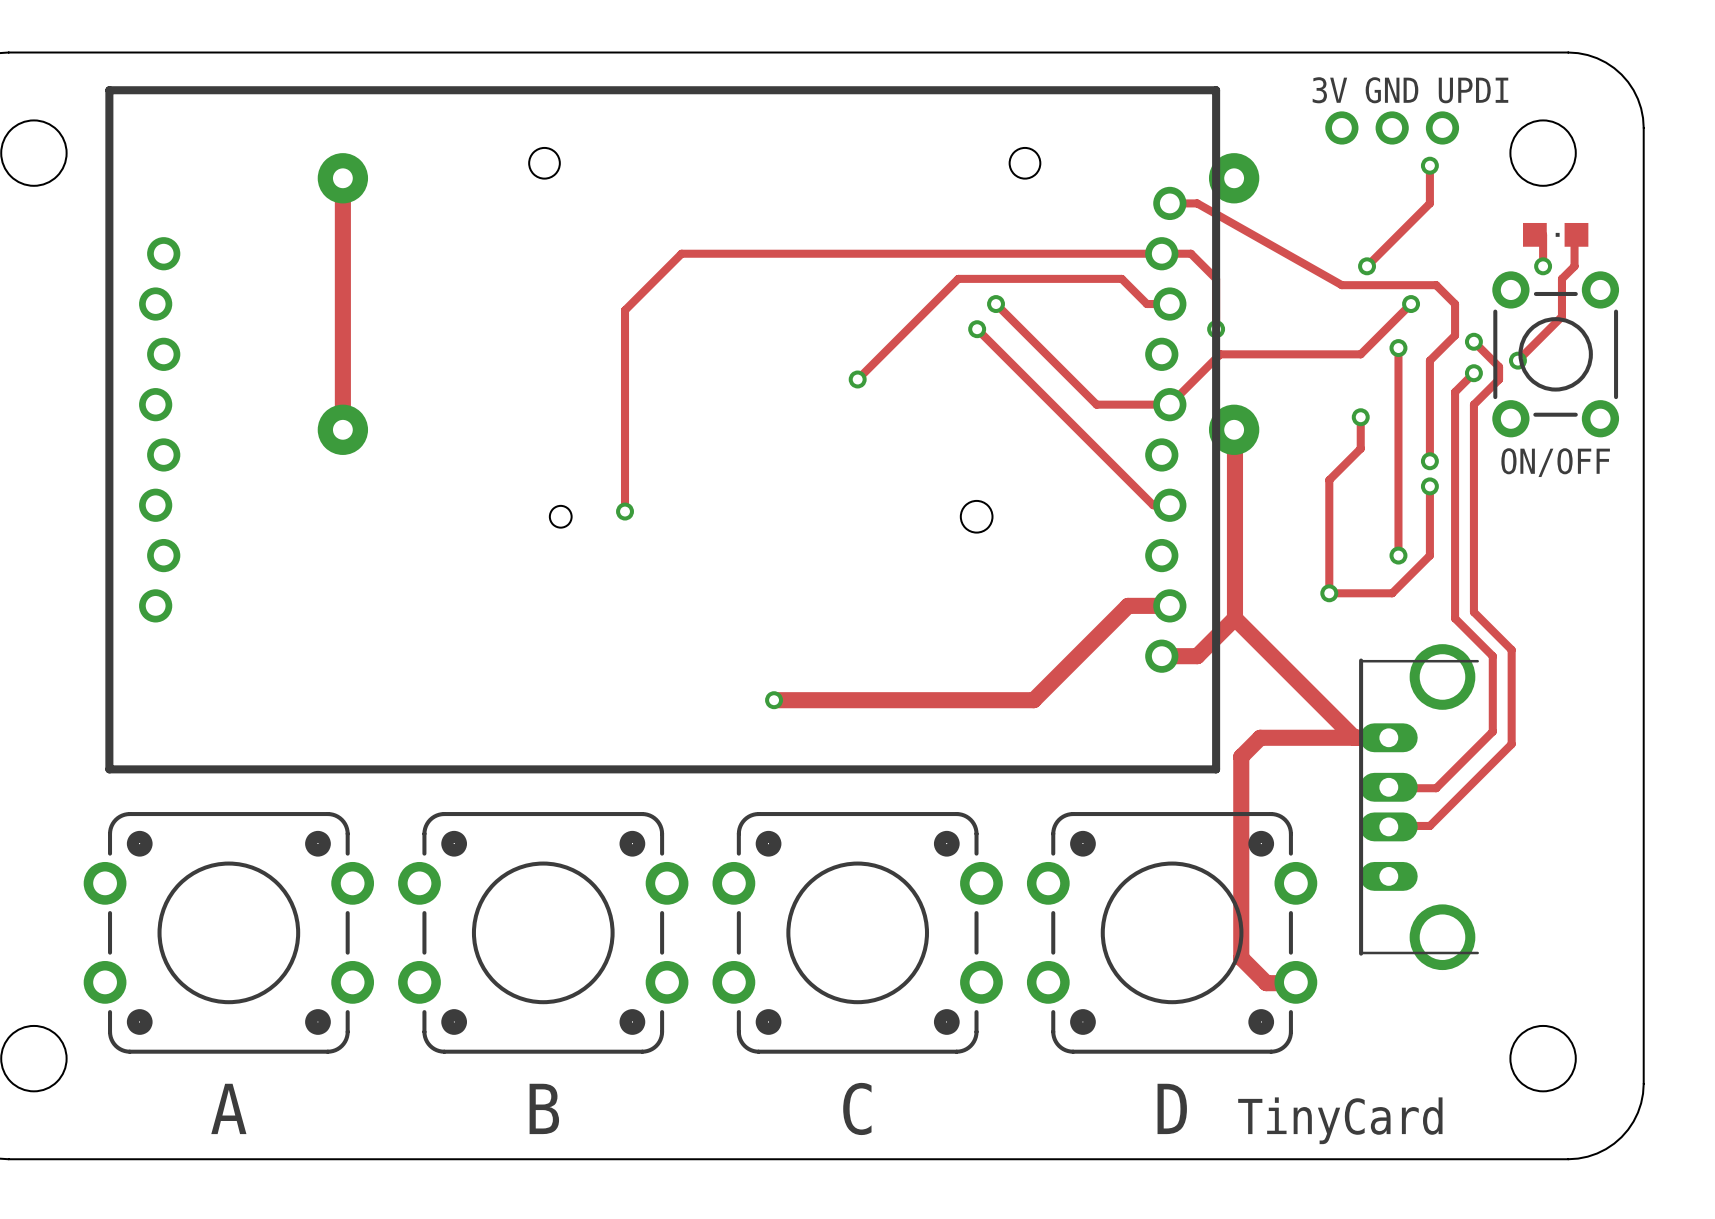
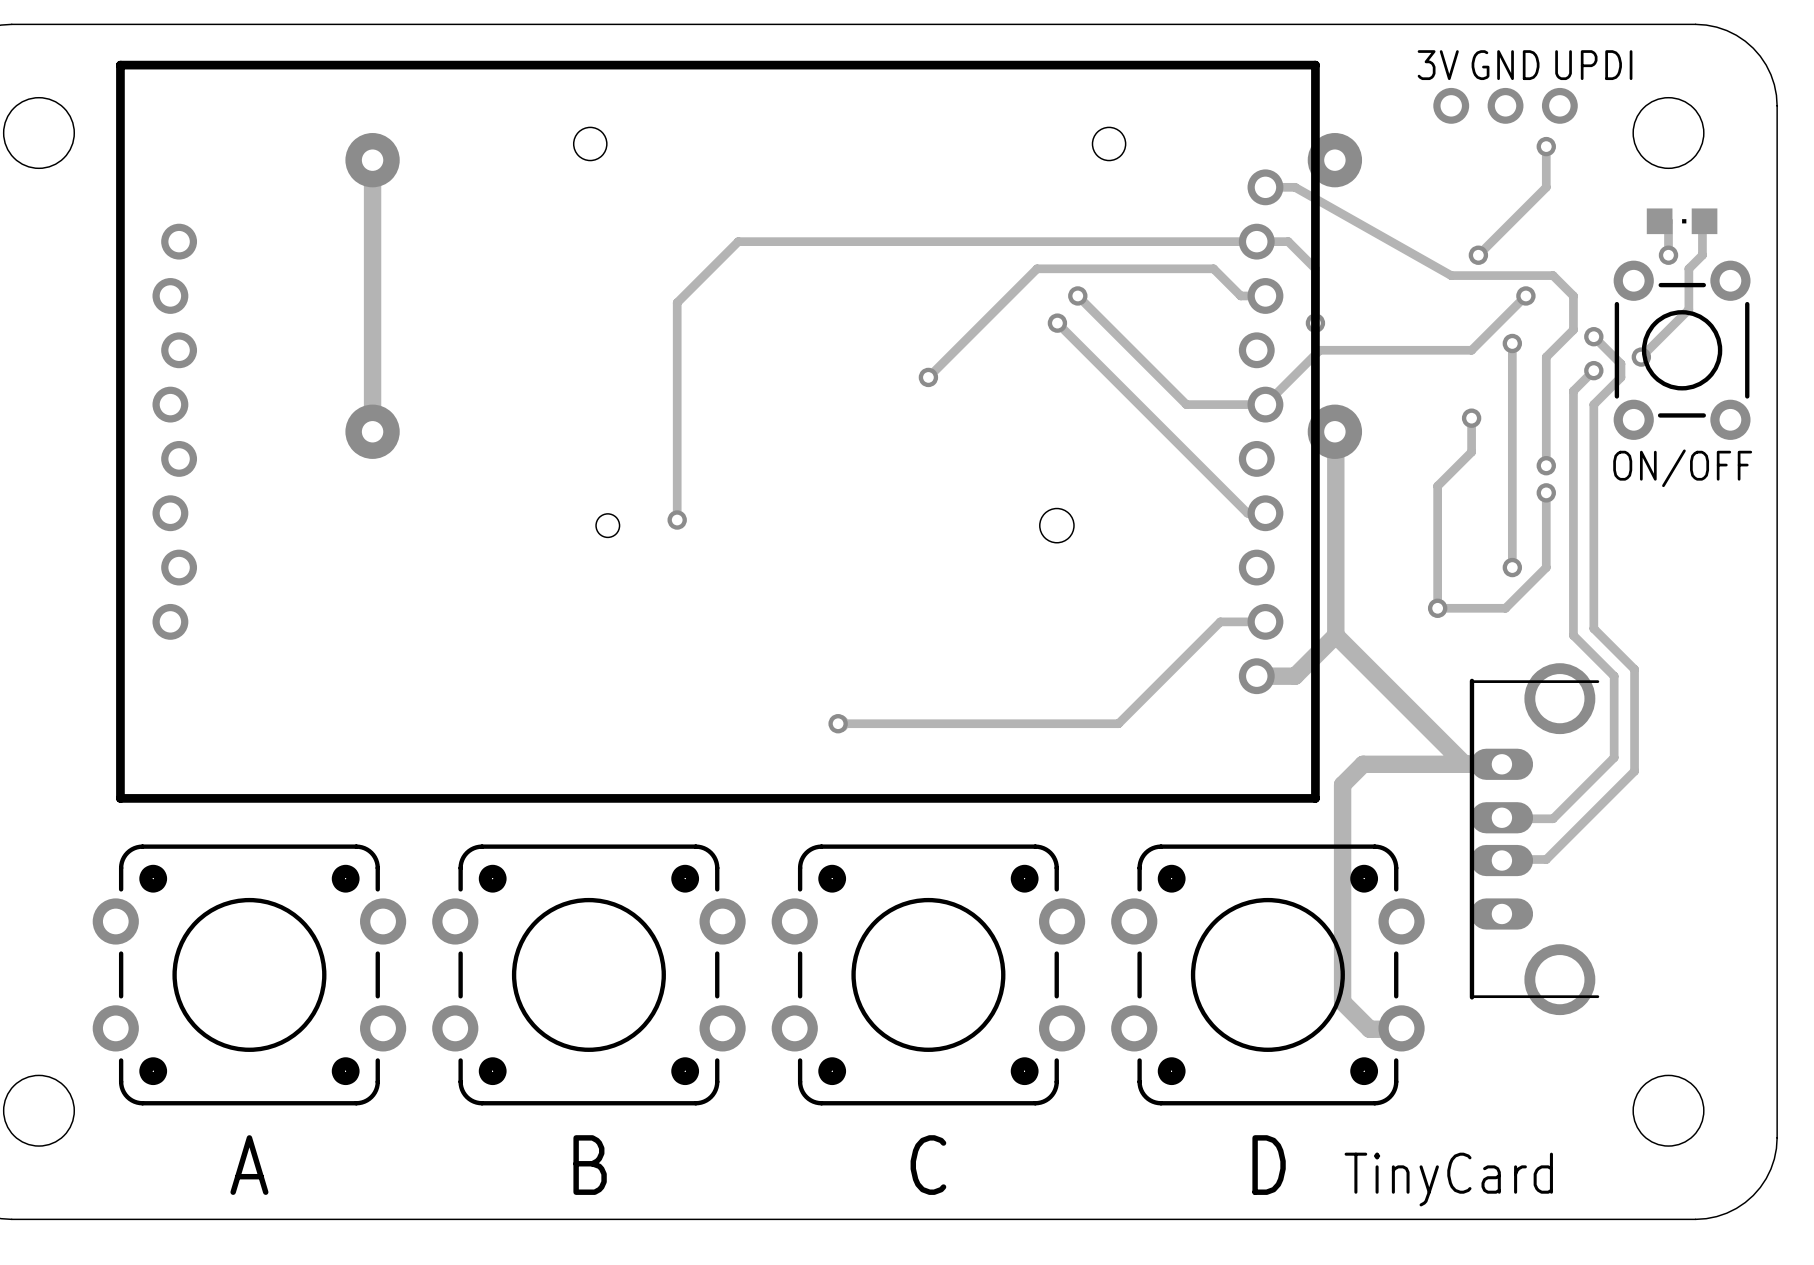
track width: thick (1169, 605) (1128, 605) (1033, 700) (775, 700) -> thin (1265, 621) (1220, 621) (1118, 723) (840, 723)

